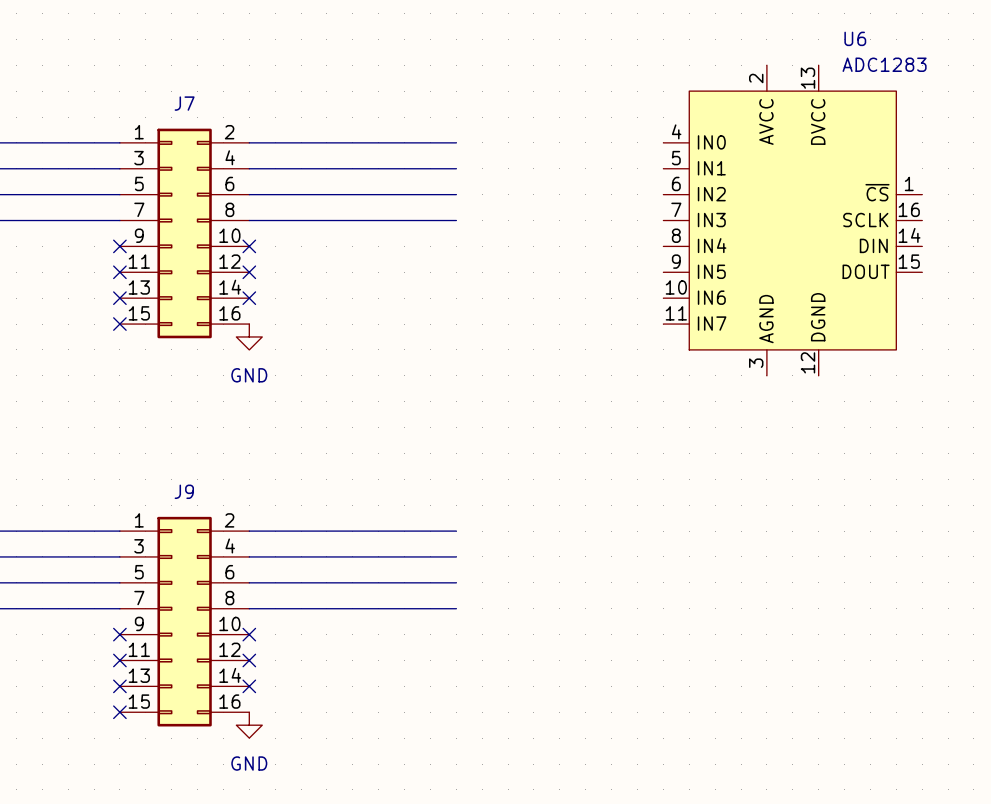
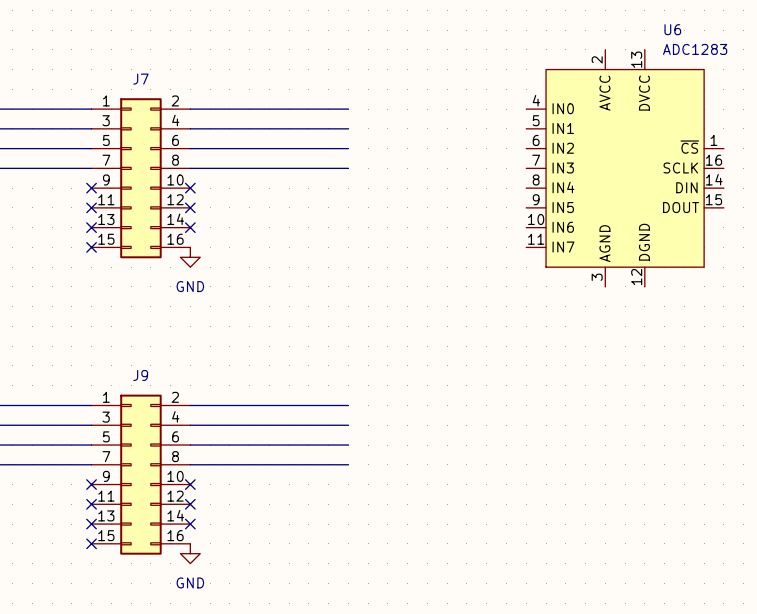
U6 position: (792, 220) -> (625, 168)

